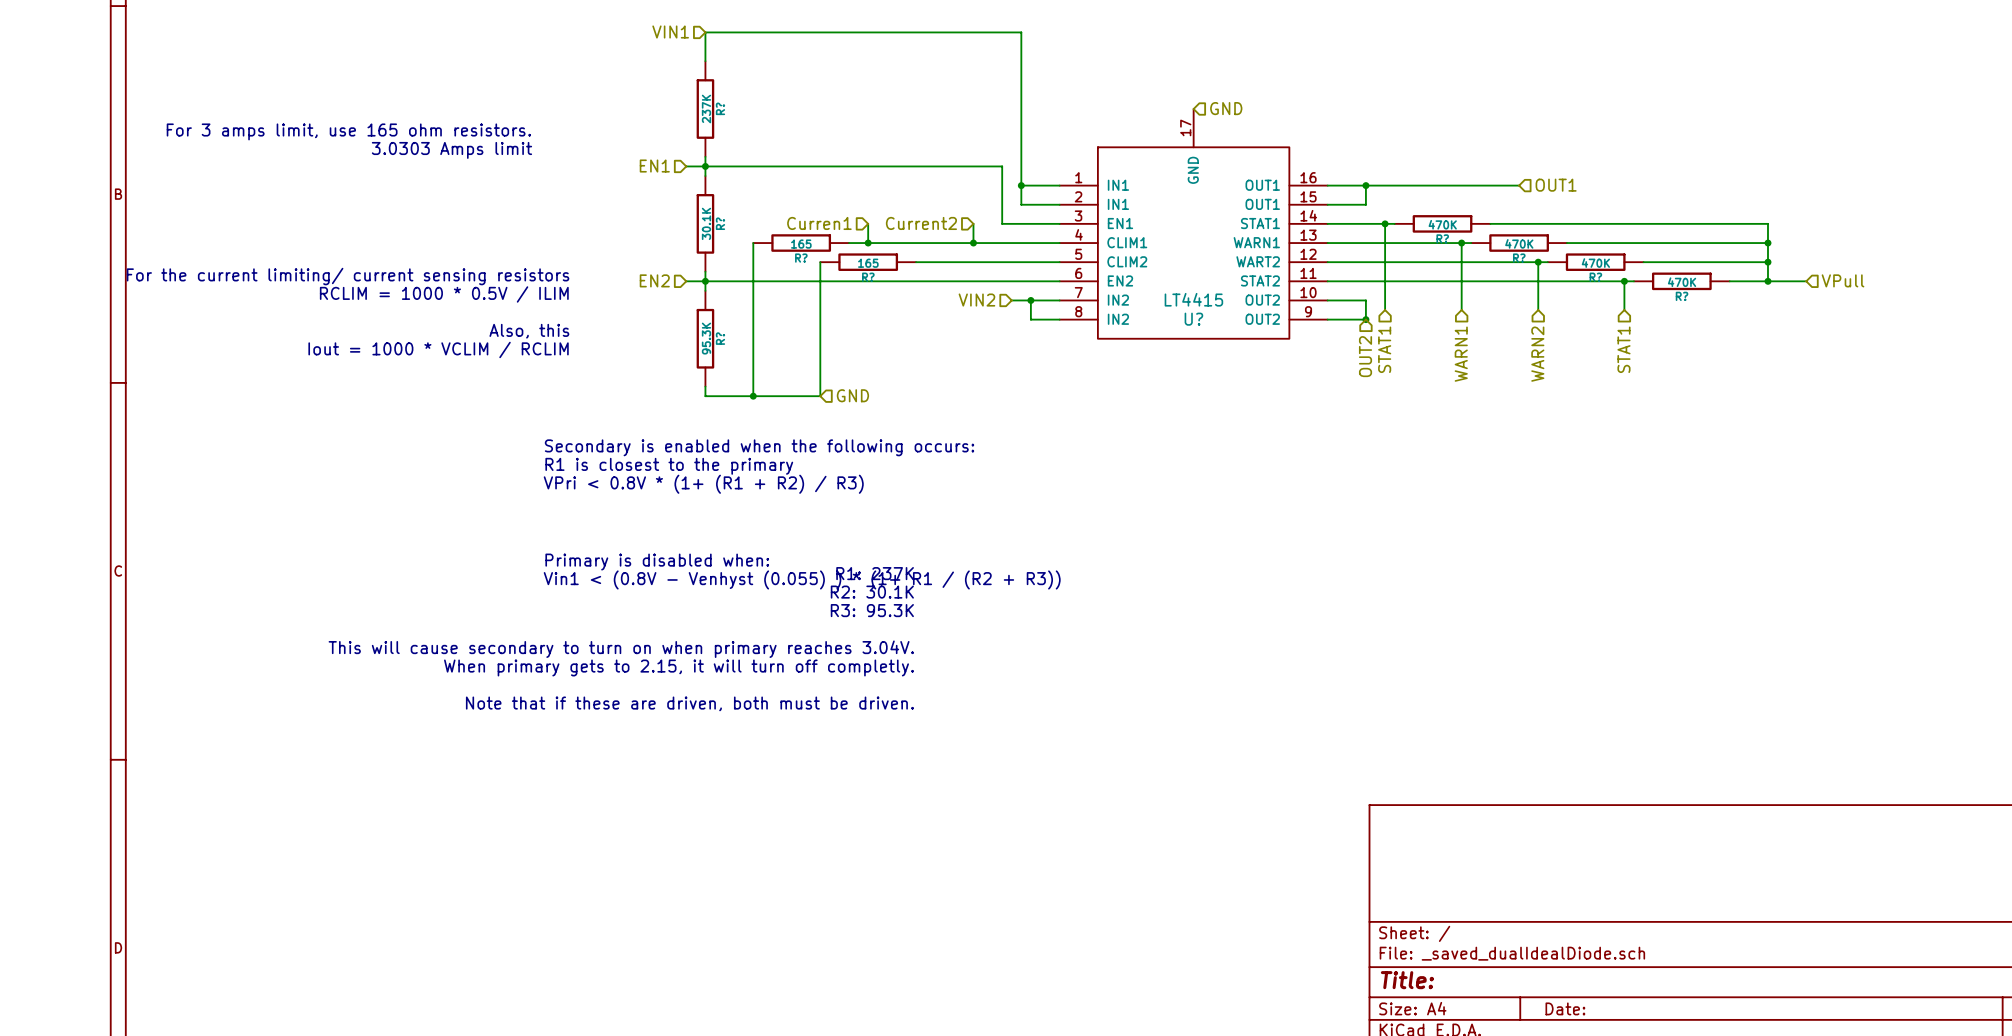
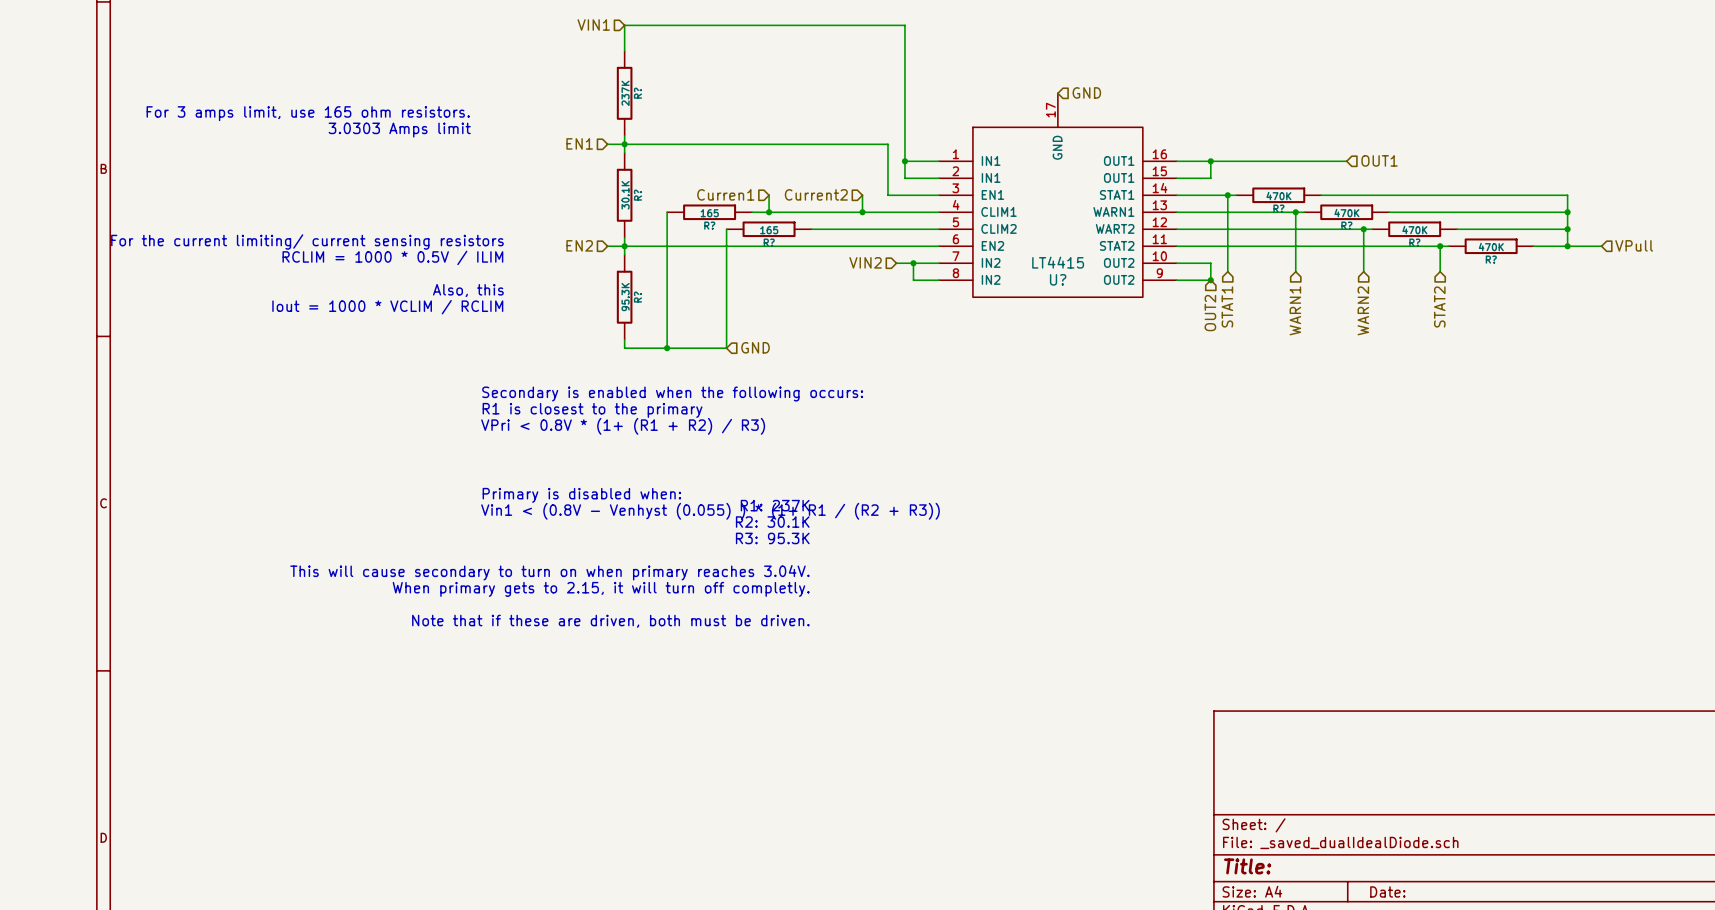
hierarchical label: STAT1 (1623, 349) -> STAT2 (1439, 306)

